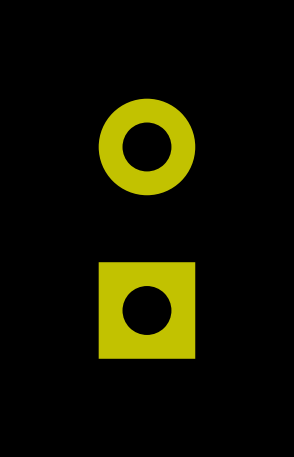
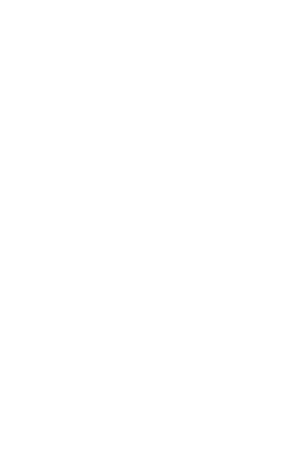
part: (146, 228) -> none

